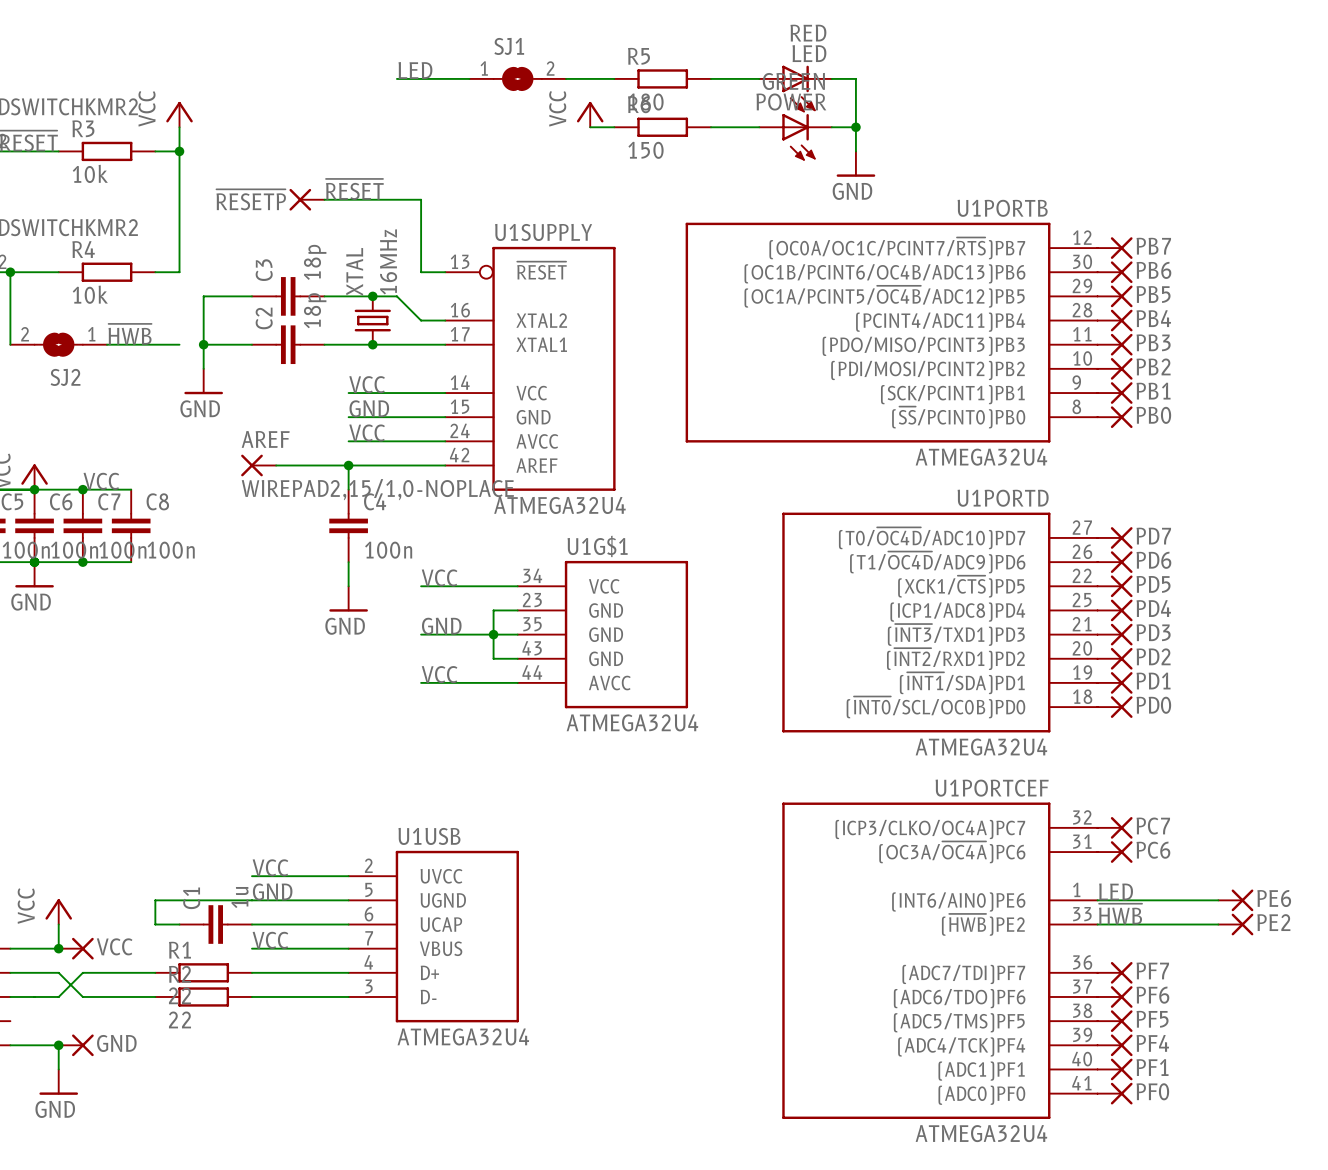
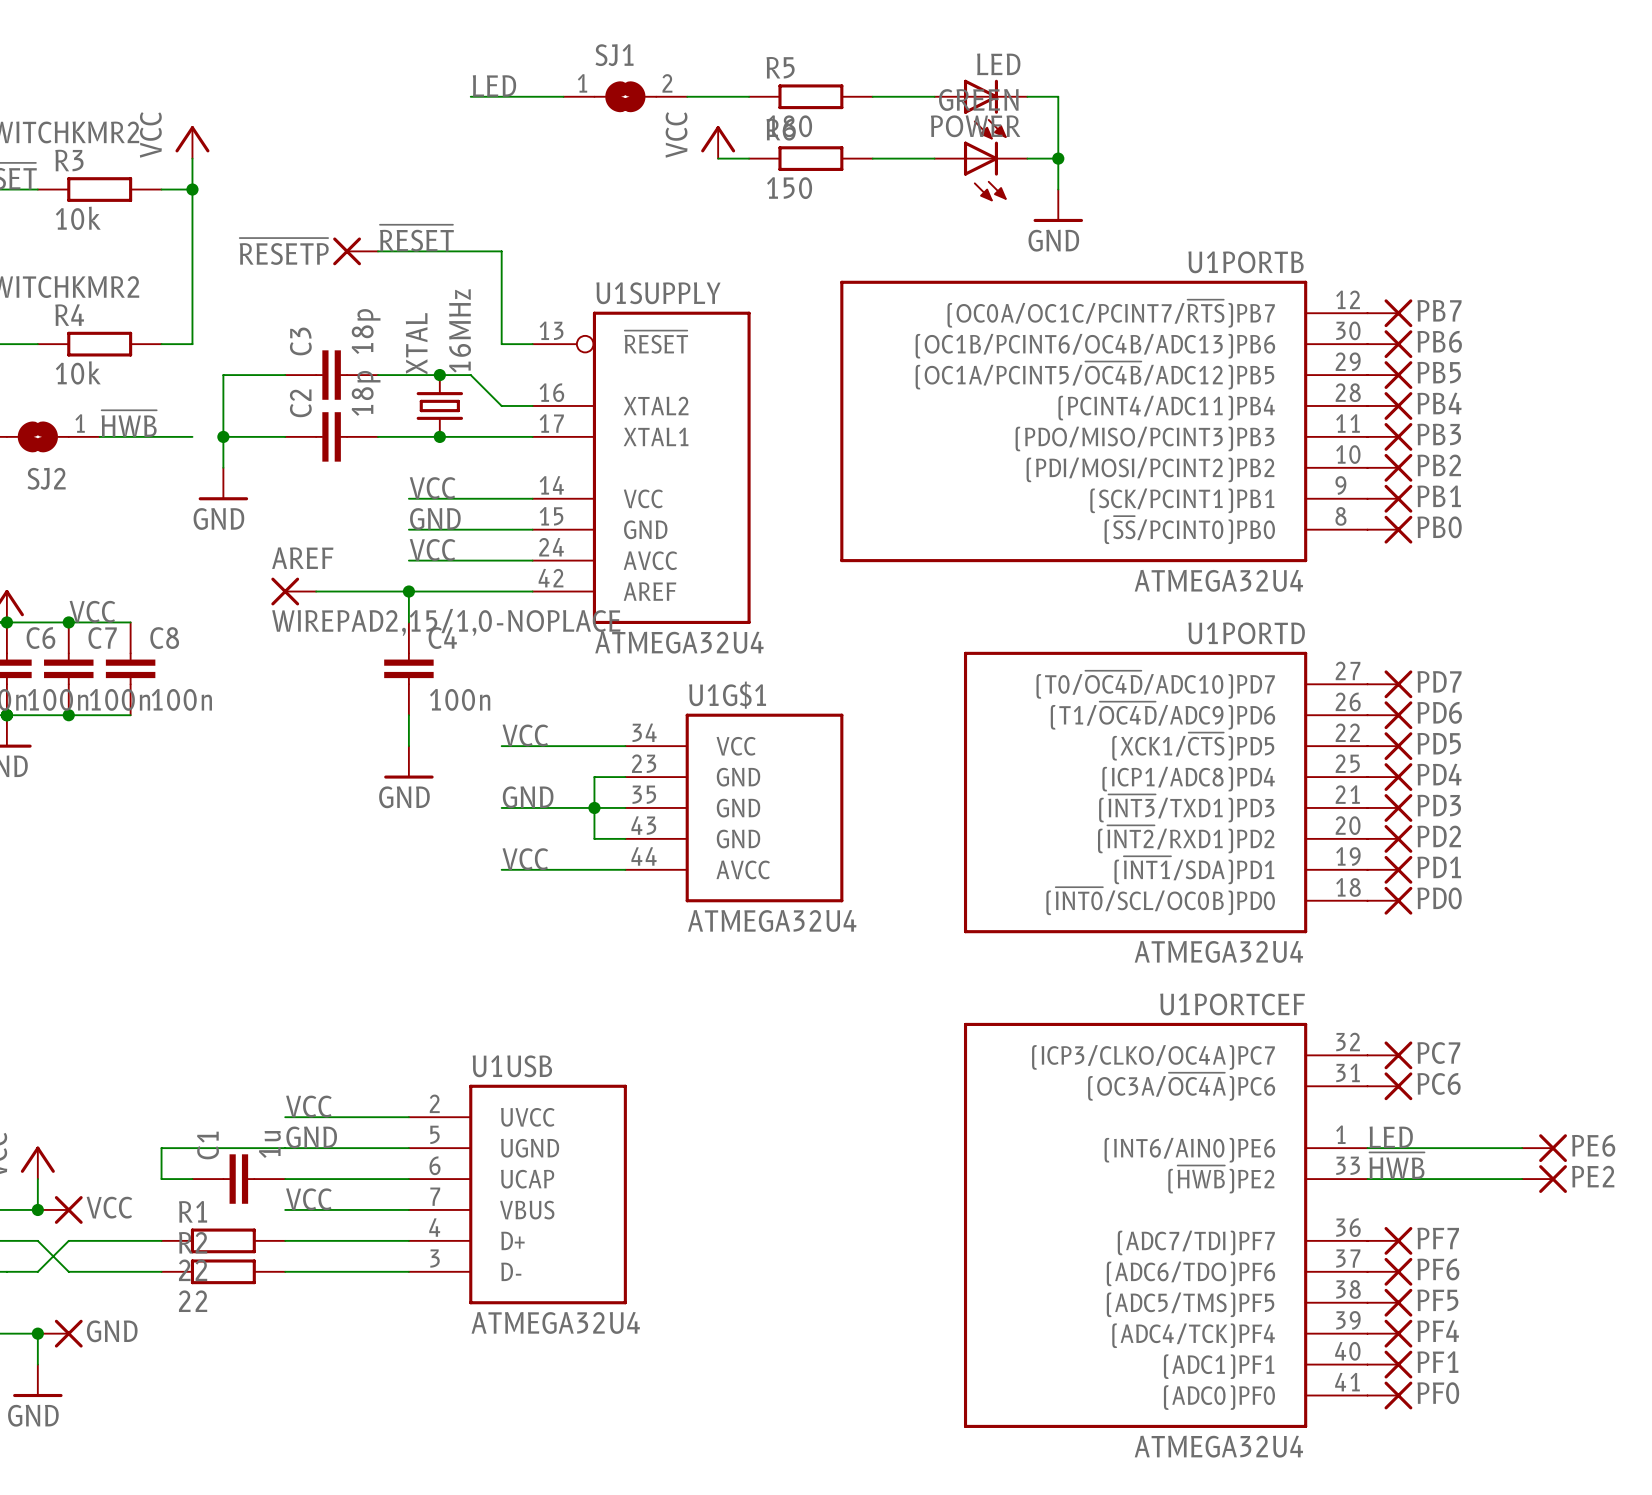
LED value: RED (808, 33) -> none

